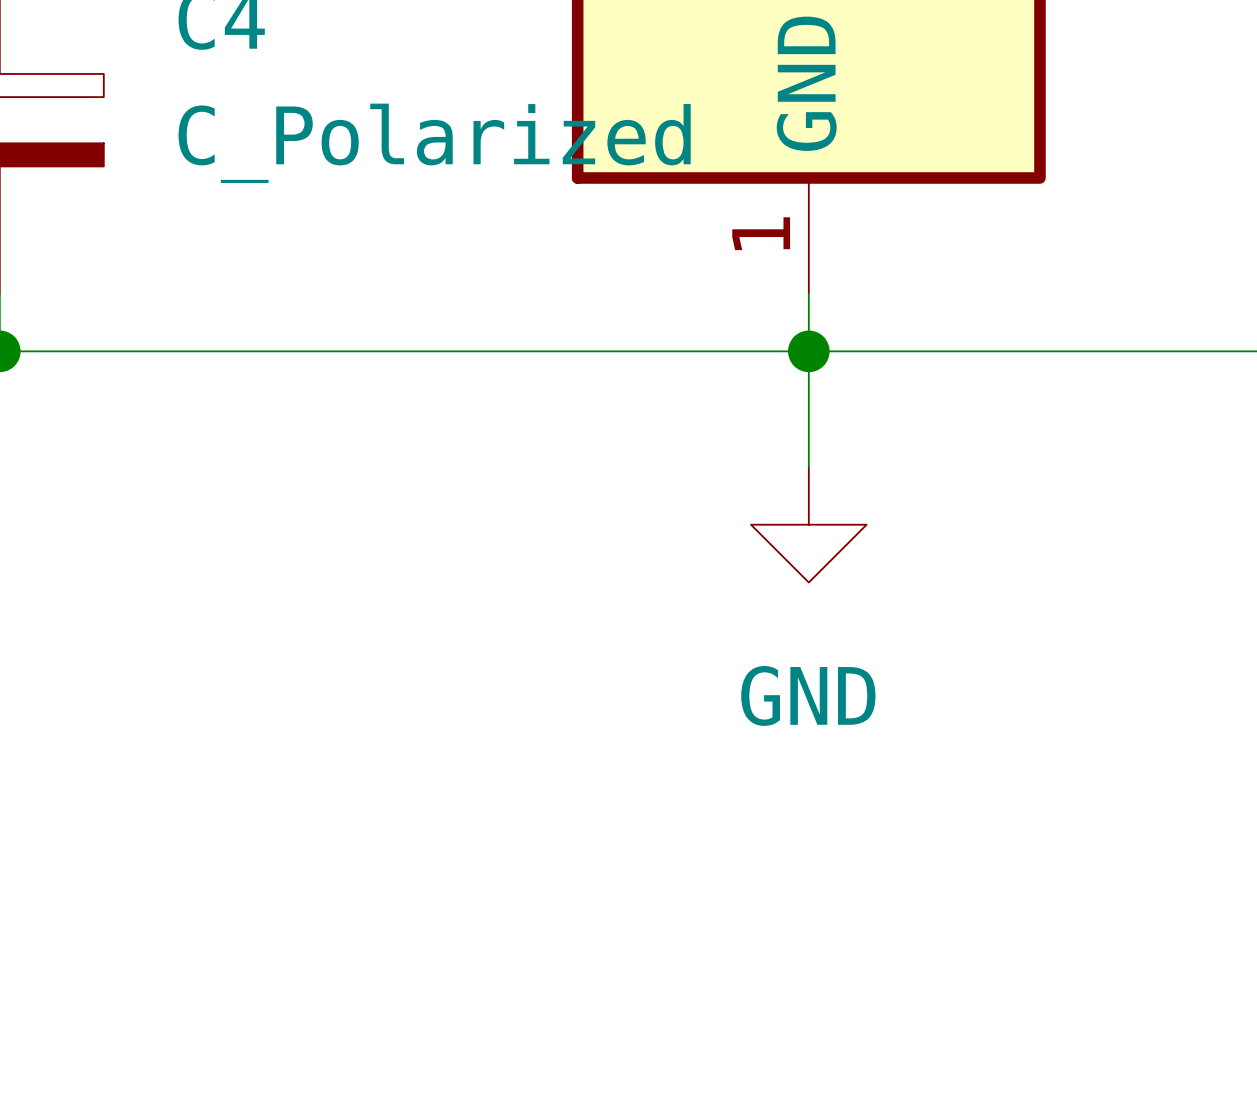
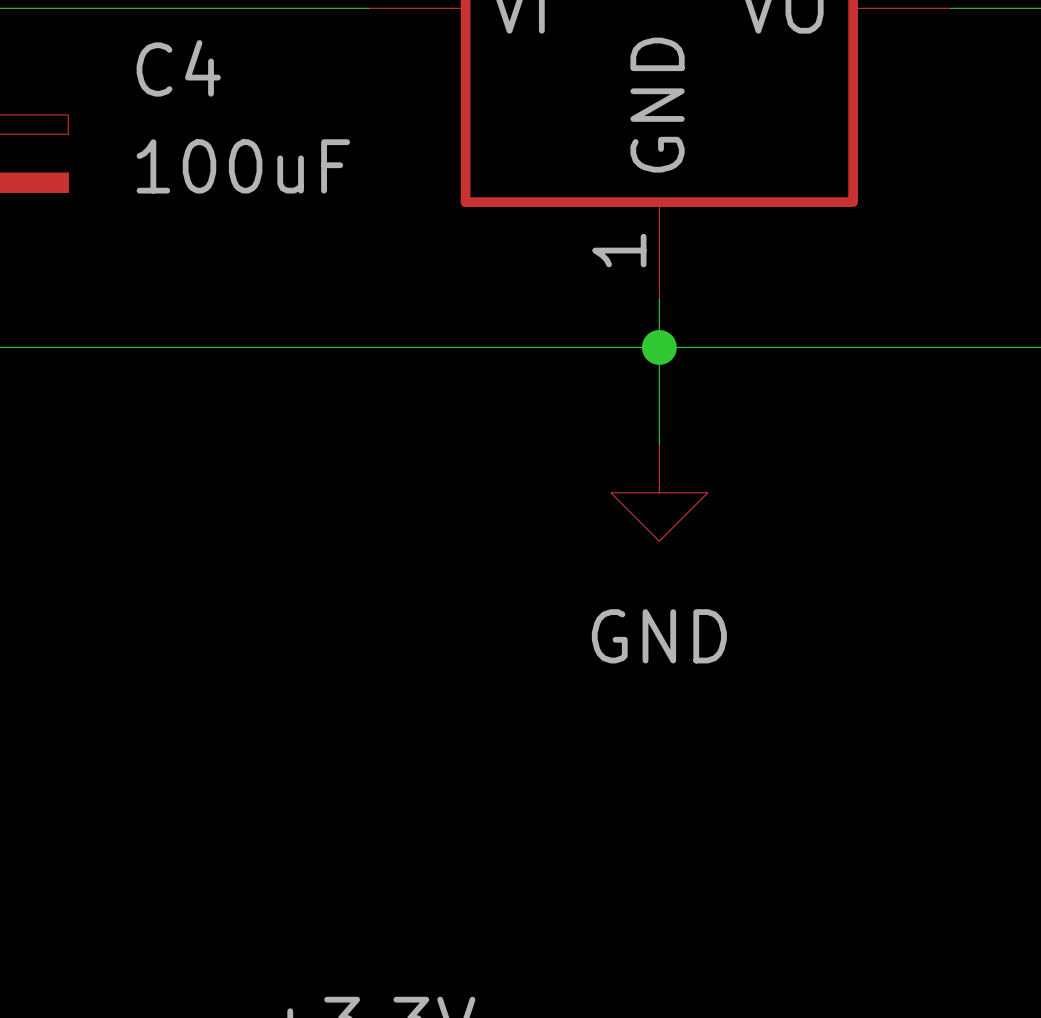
C4 value: C_Polarized (434, 143) -> 100uF (243, 166)

